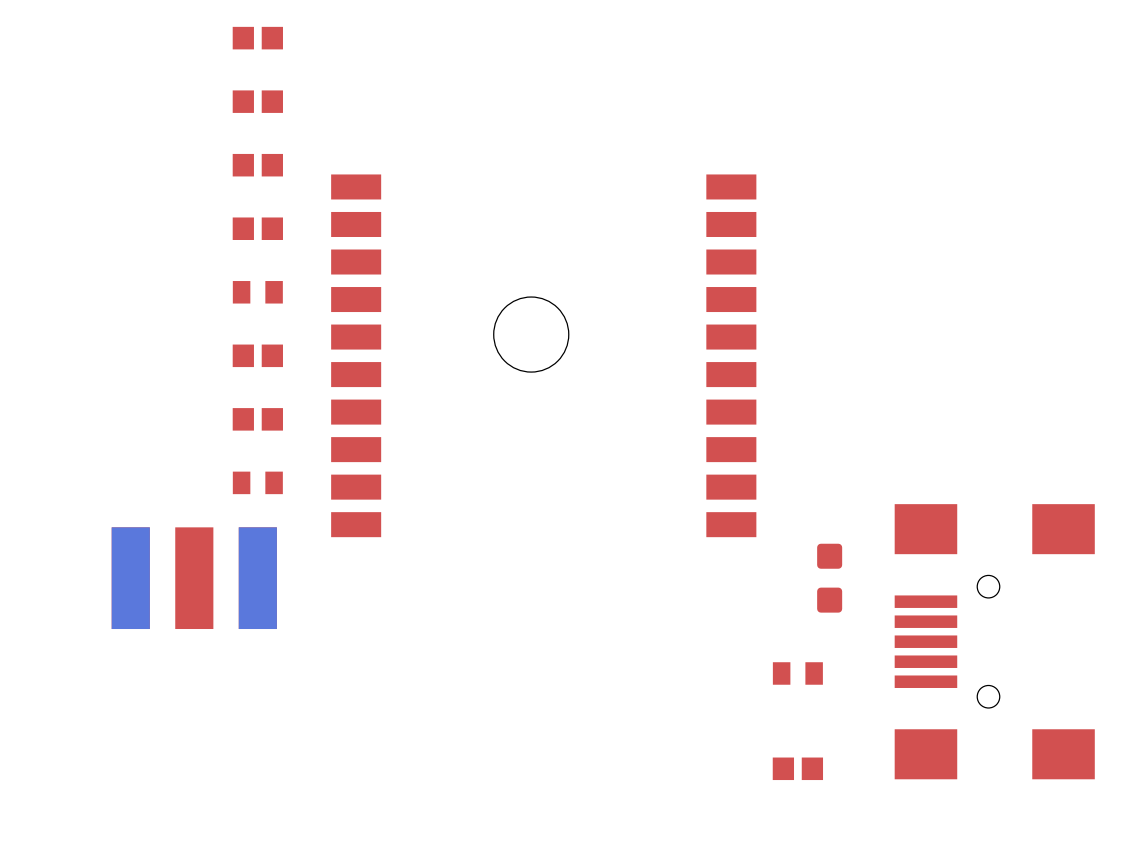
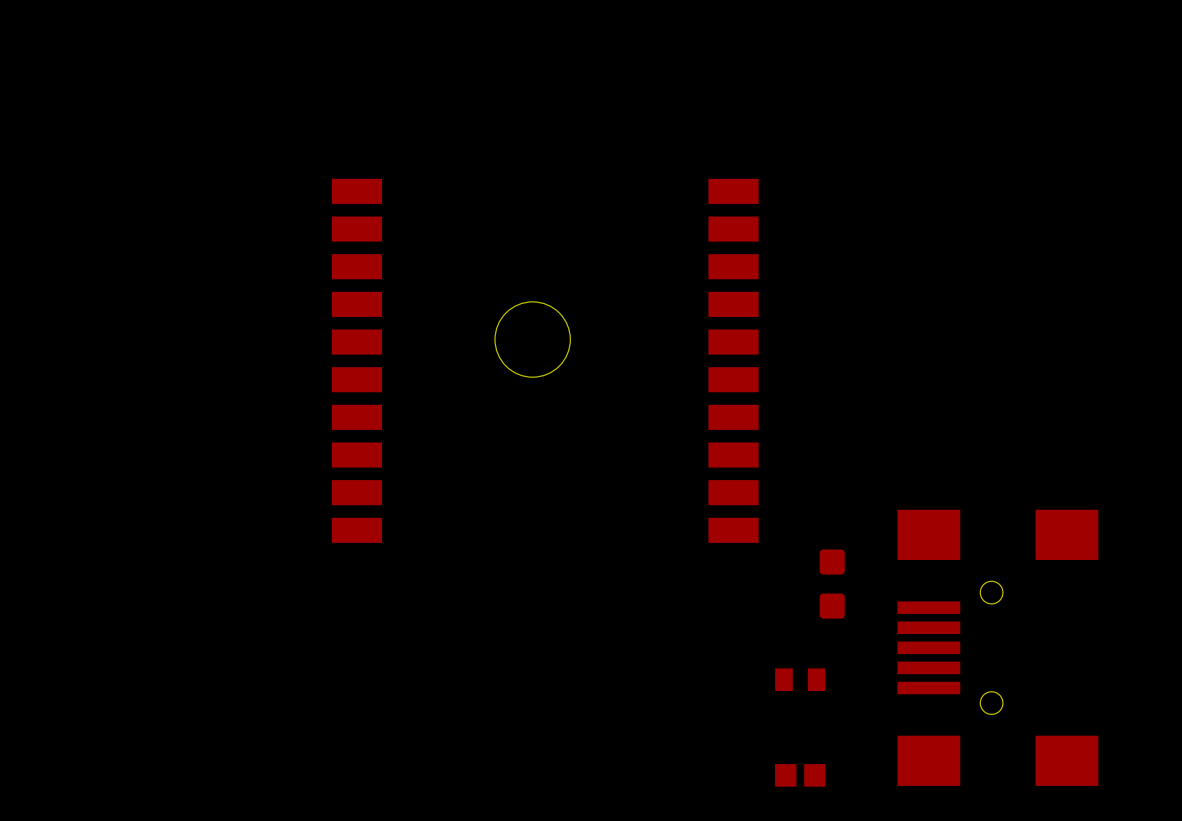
part: (257, 38) -> none
part: (257, 101) -> none
part: (257, 165) -> none
part: (257, 228) -> none
part: (257, 292) -> none
part: (257, 355) -> none
part: (257, 419) -> none
part: (257, 482) -> none
part: (194, 578) -> none

